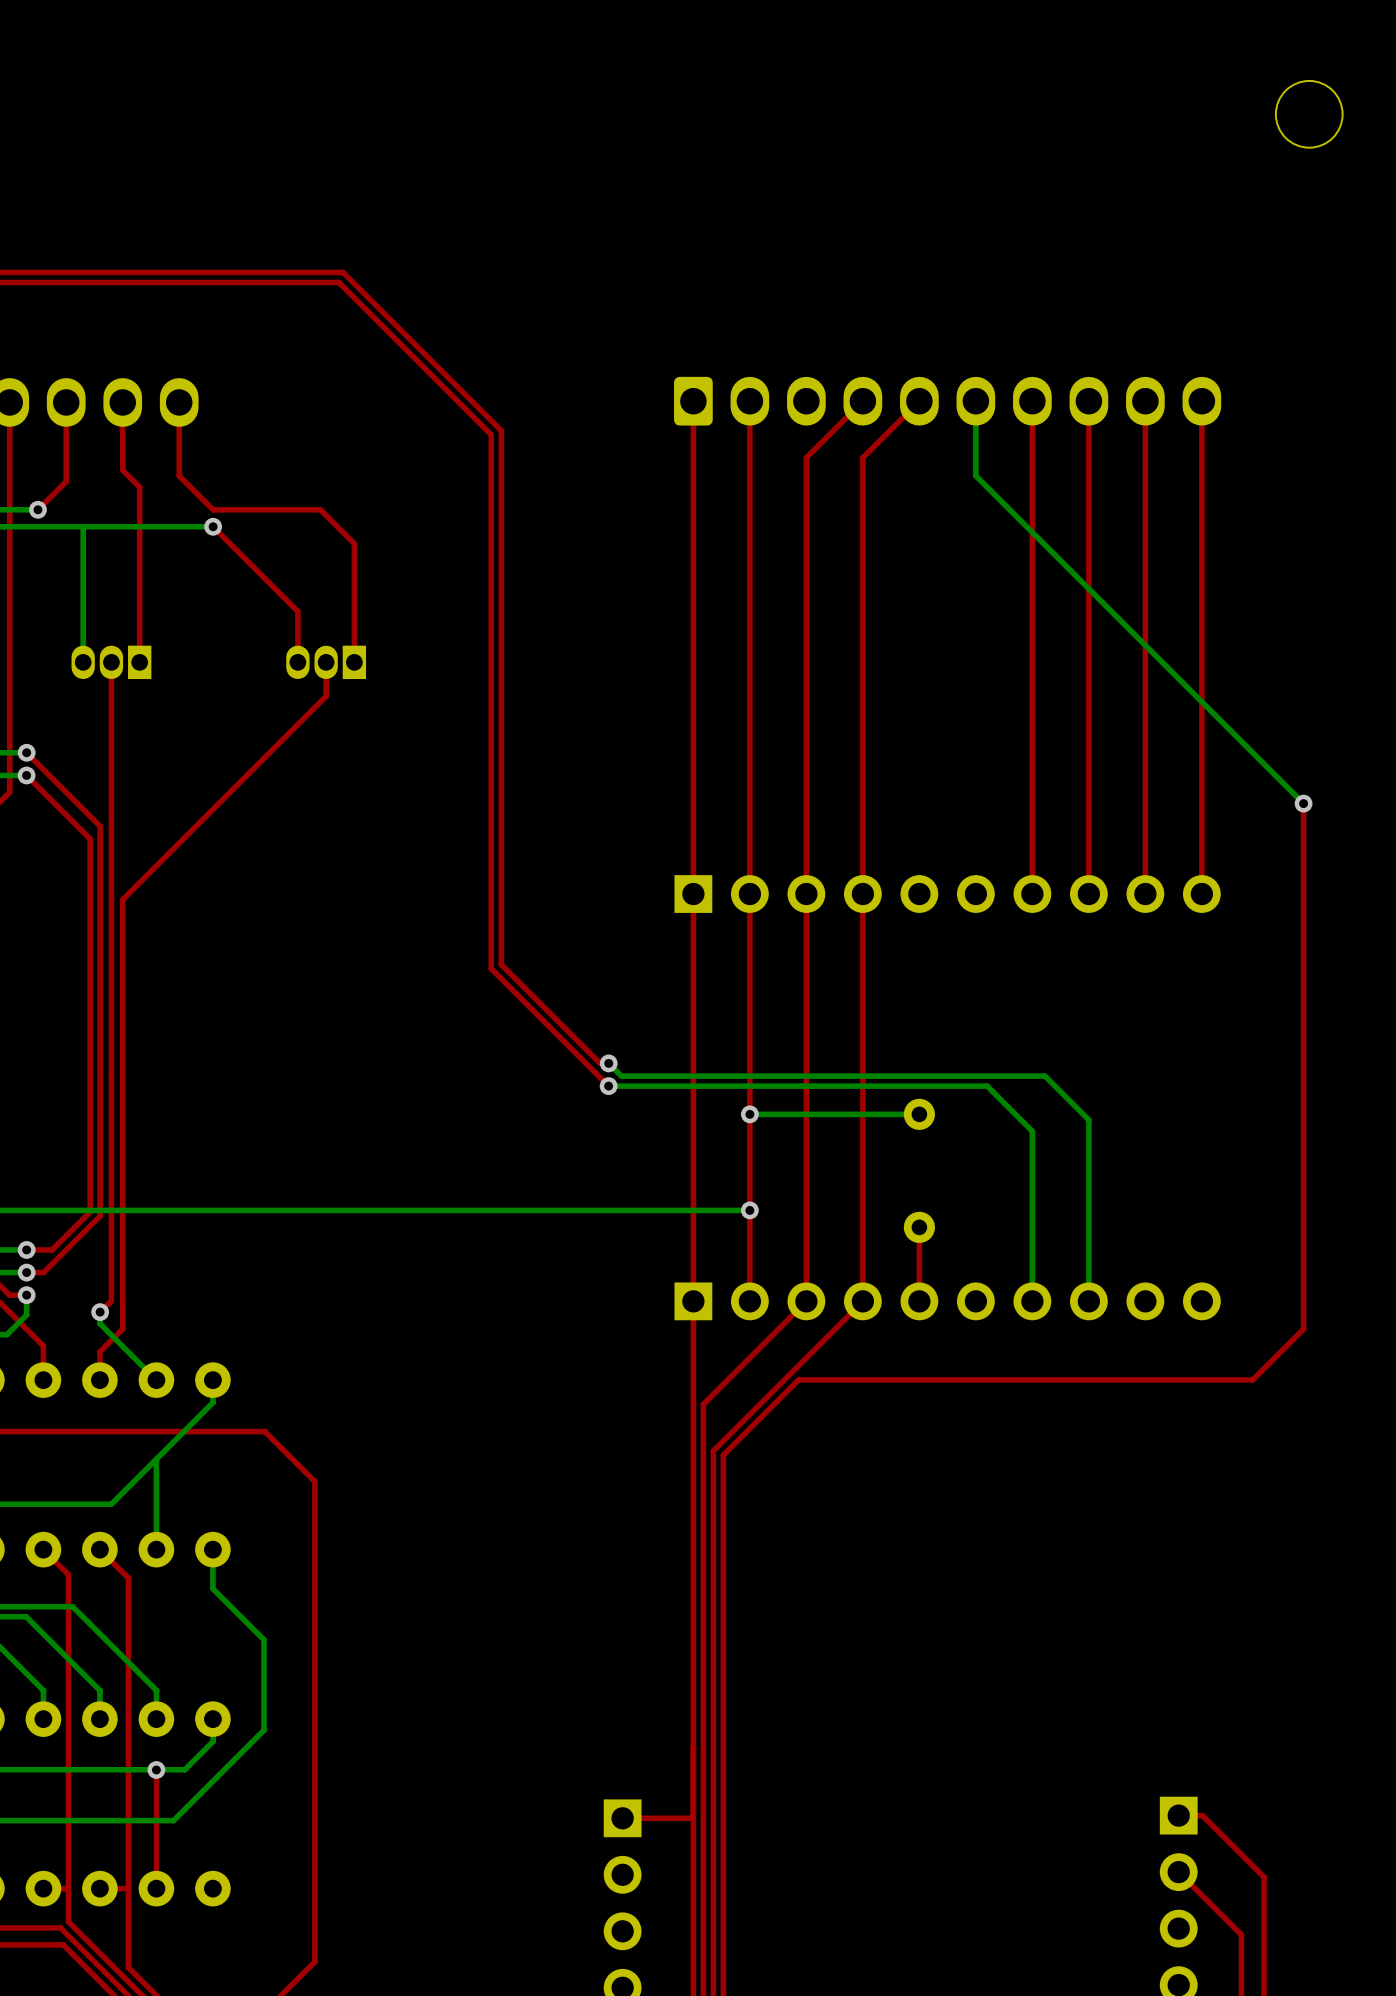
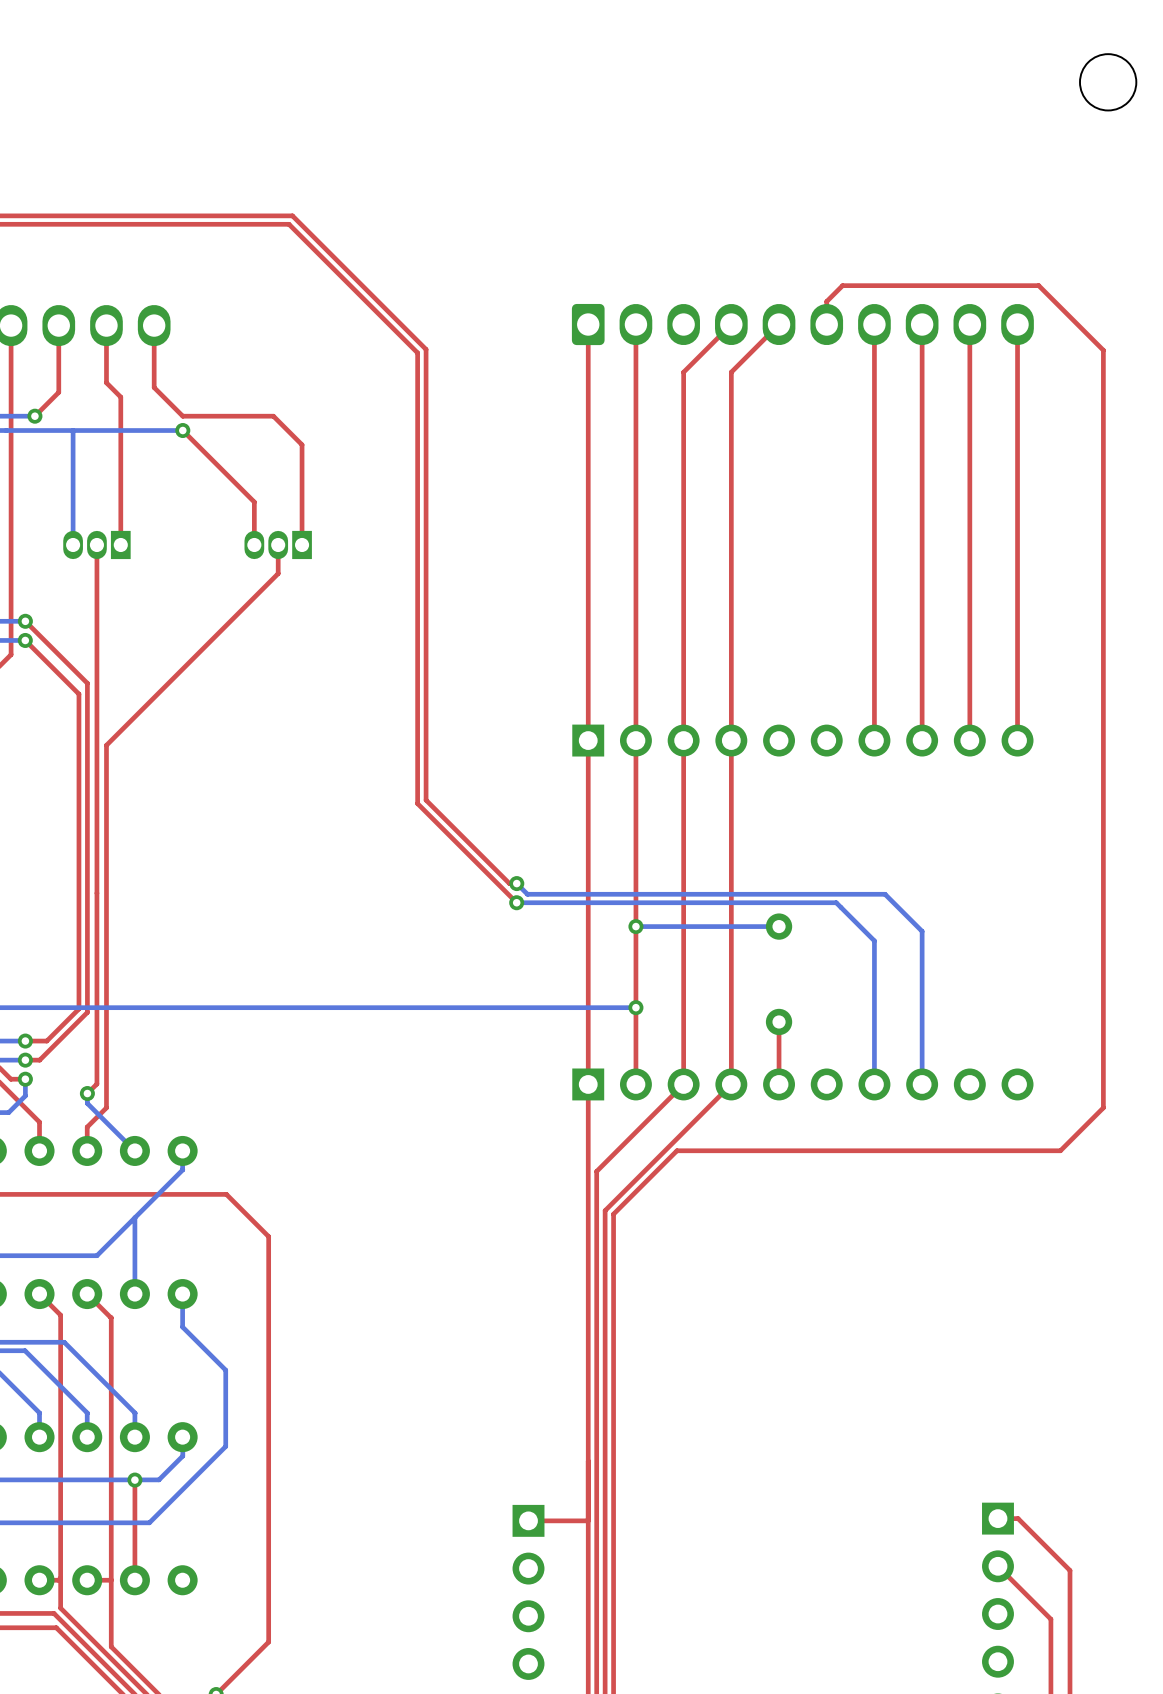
top track: none -> (826, 324) (826, 301) (842, 285) (1038, 285) (1103, 350) (1103, 664)
bottom track: (975, 401) (975, 475) (1303, 803) -> none
via: (1303, 803) -> none

